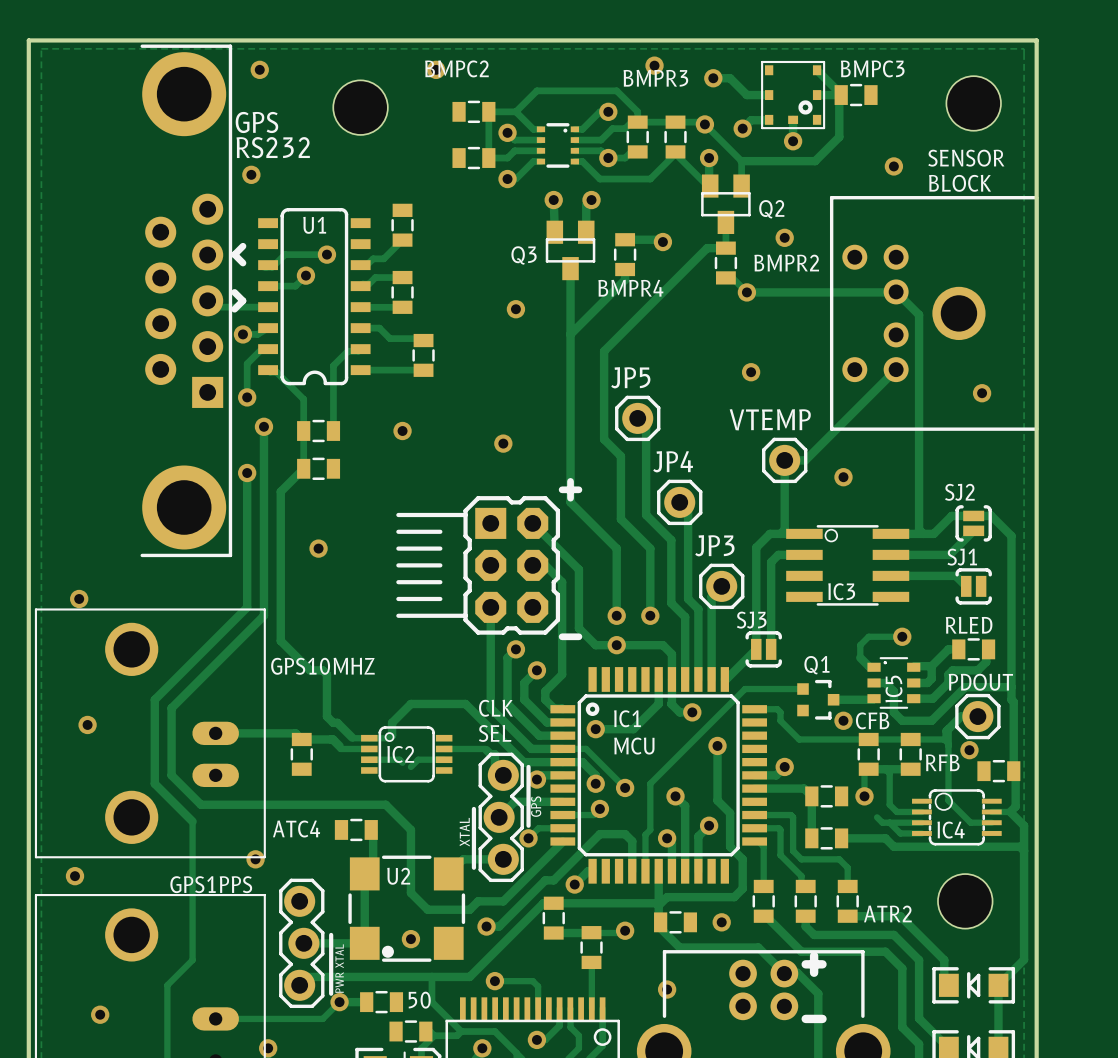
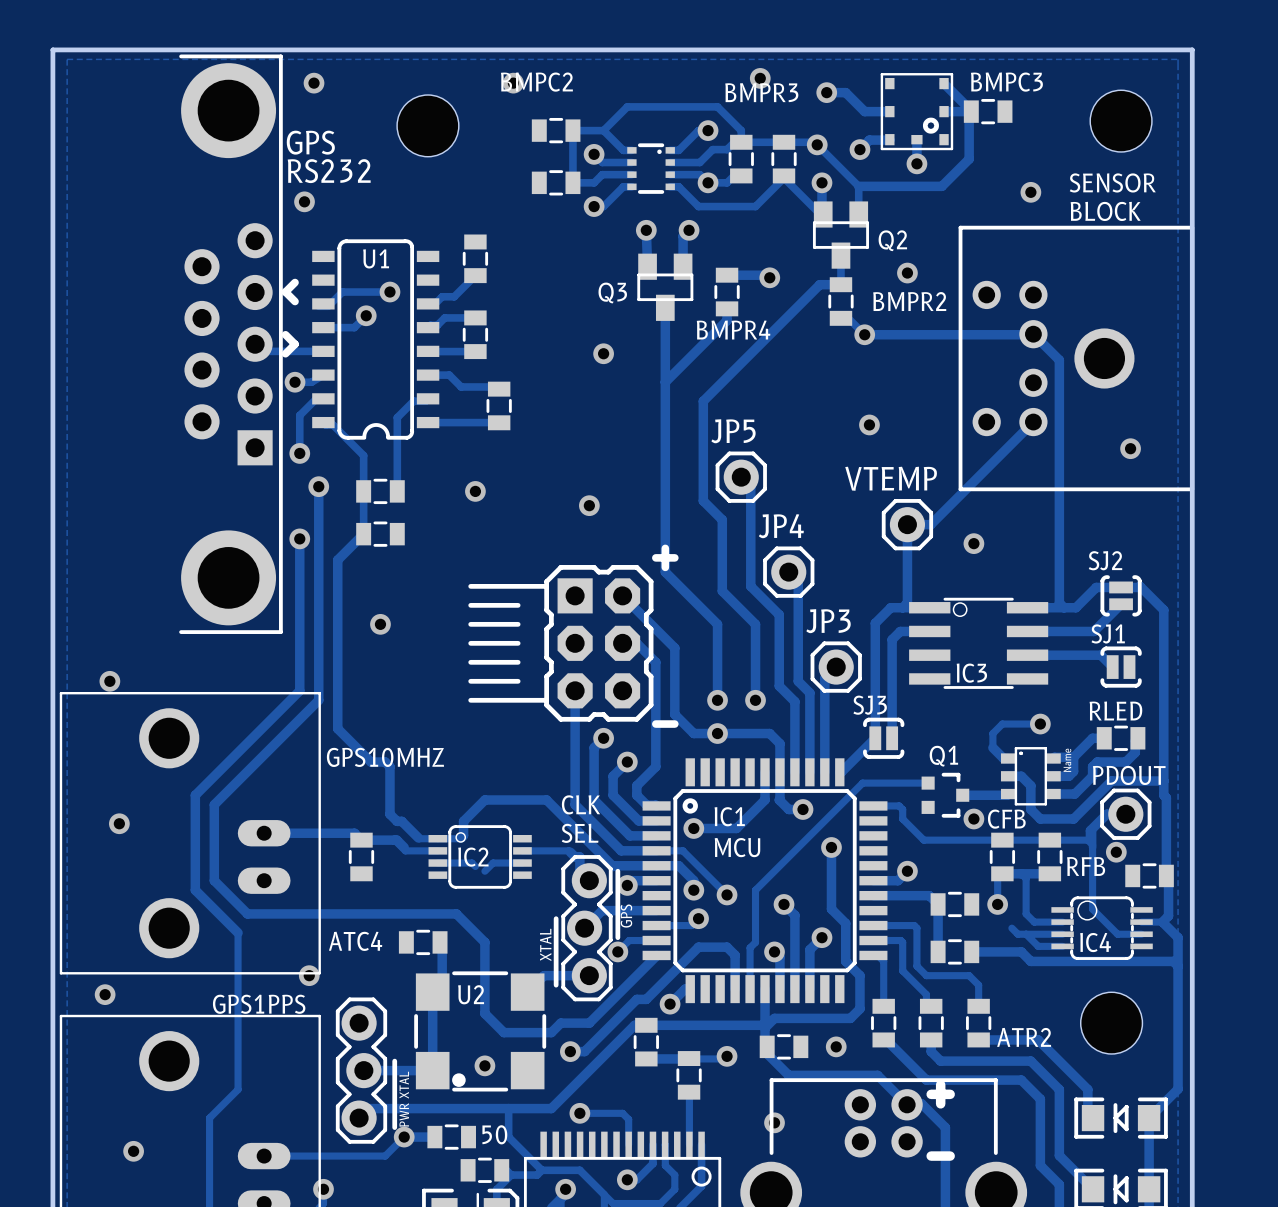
IC5: (893, 682) -> none
part: none -> (1030, 776)

